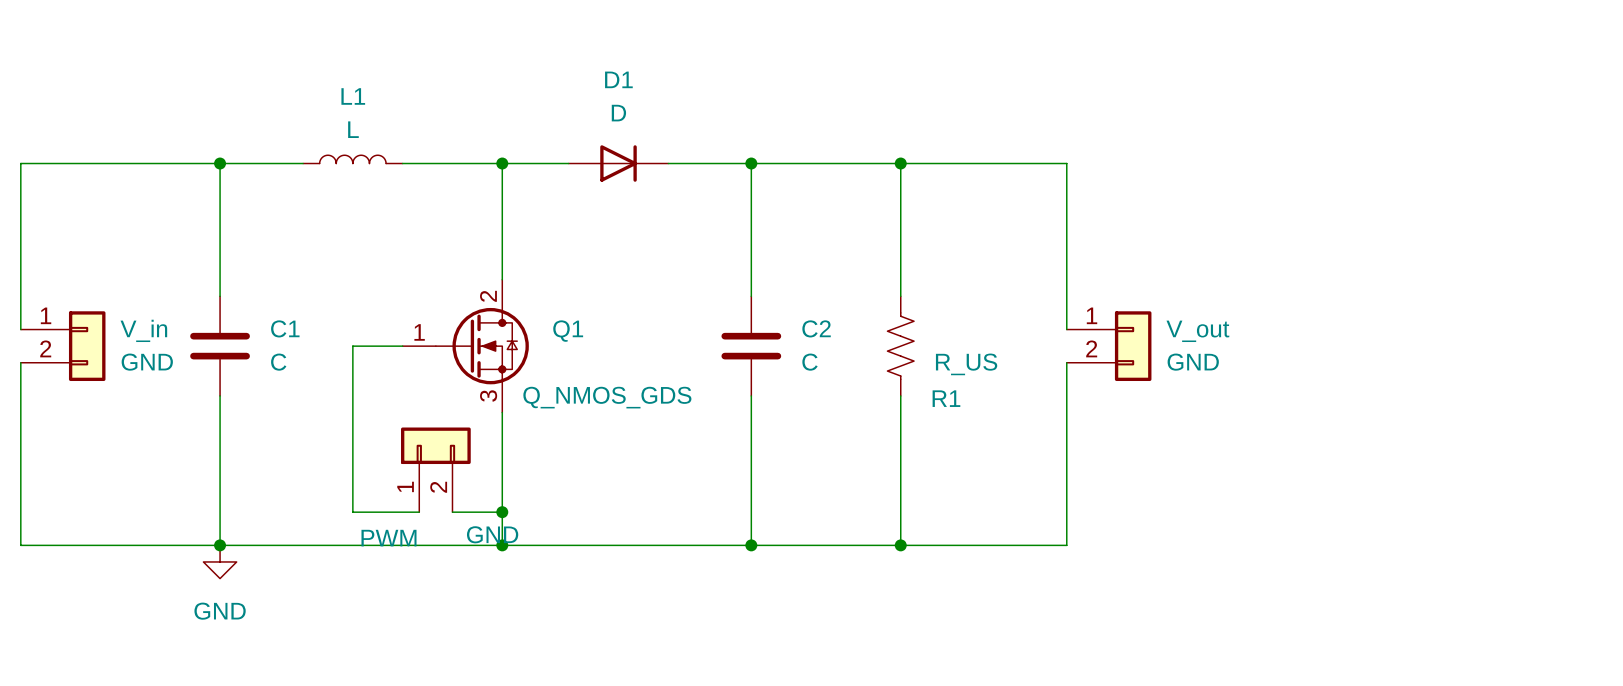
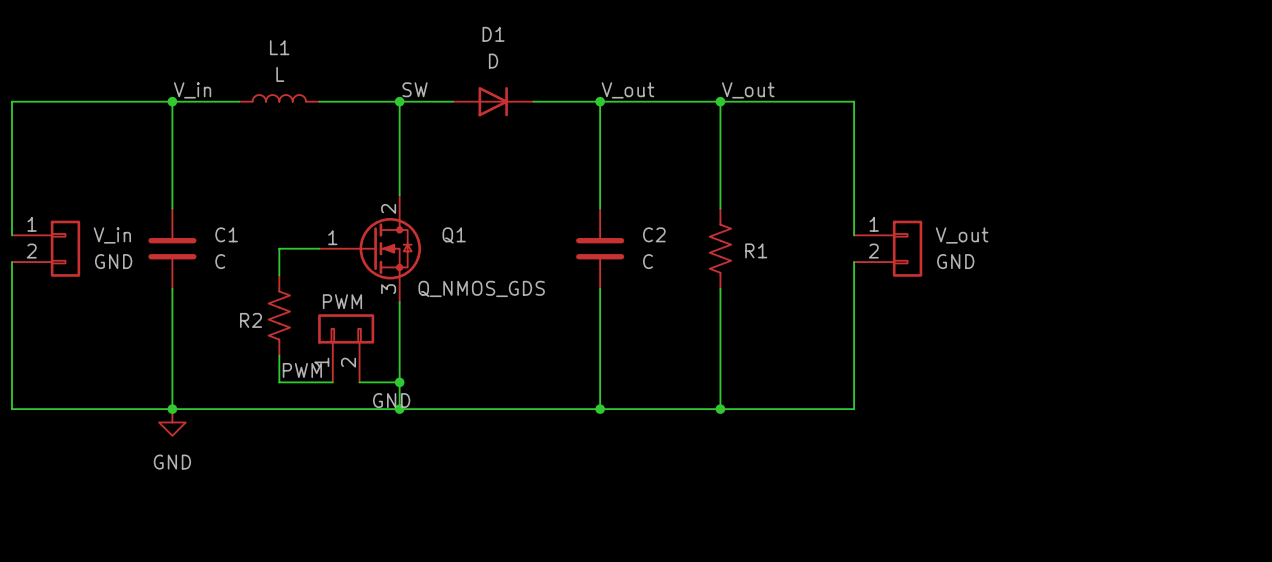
label: none -> SW (415, 89)
label: none -> V_in (192, 90)
label: none -> V_out (627, 90)
label: none -> V_out (748, 90)
R1 value: R_US (966, 364) -> none
R1 name position: R1 (946, 398) -> R1 (756, 250)
R2: none -> (279, 315)
label: none -> PWM (302, 370)
PWM name position: PWM (388, 538) -> PWM (342, 301)

